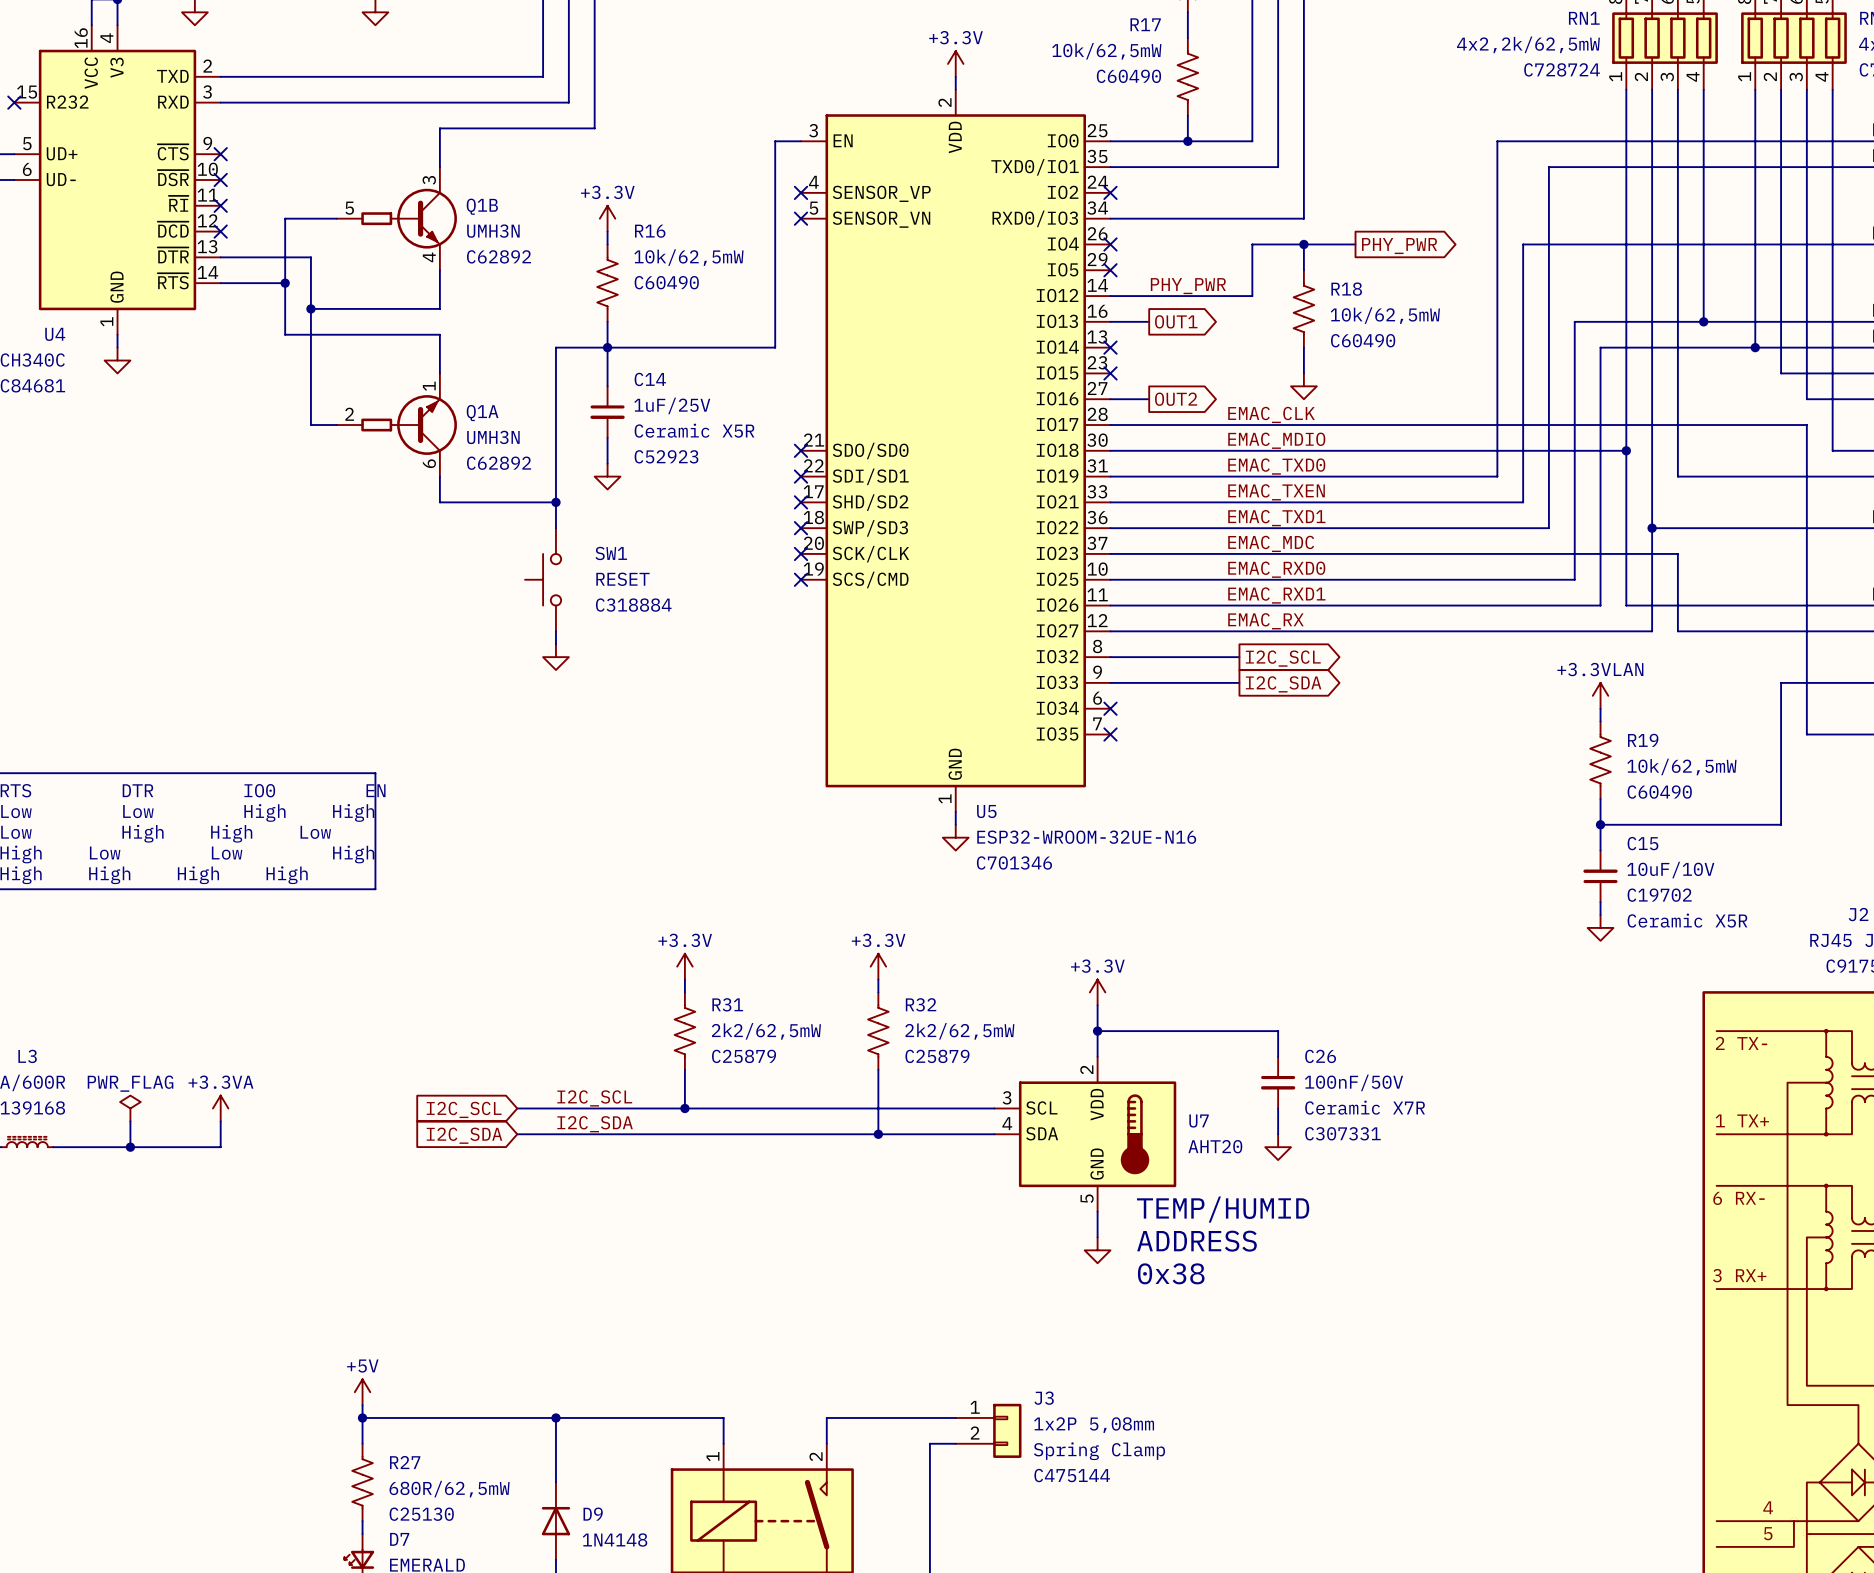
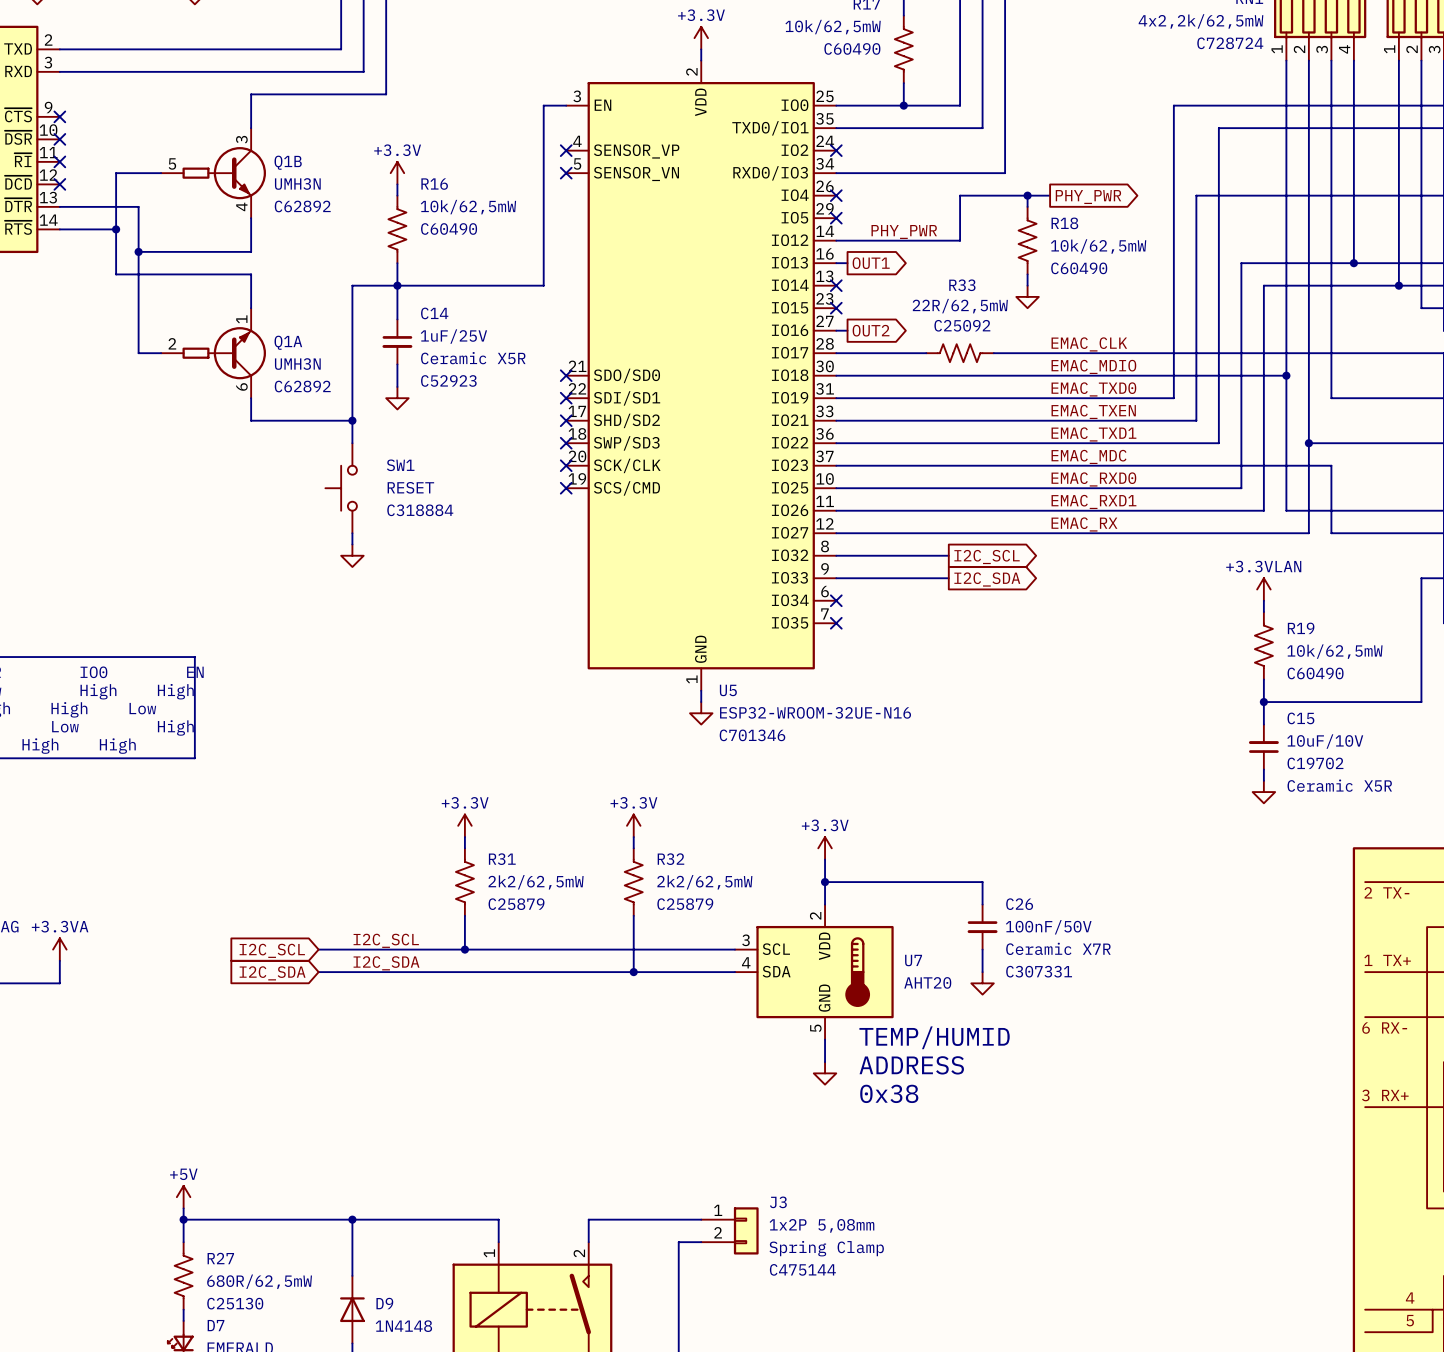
wire: (1303, 244) (1303, 270) -> none
junction position: (1303, 244) -> (1027, 195)
wire: none -> (1027, 195) (1027, 206)
R18 position: (1303, 308) -> (1027, 240)
wire: (1123, 321) (1149, 321) -> none
global label position: OUT1 (1176, 321) -> OUT1 (871, 263)
wire: none -> (1027, 274) (1027, 285)
wire: (1303, 347) (1303, 373) -> none
power symbol position: (1303, 386) -> (1027, 296)
wire: (1123, 399) (1149, 399) -> none
global label position: OUT2 (1176, 399) -> OUT2 (871, 330)
label position: EMAC_CLK (1271, 414) -> EMAC_CLK (1089, 344)
R33: none -> 22R/62,5mW (960, 353)
label position: EMAC_MDIO (1276, 440) -> EMAC_MDIO (1093, 366)
label position: EMAC_TXD0 (1276, 466) -> EMAC_TXD0 (1093, 389)
label position: EMAC_TXEN (1276, 492) -> EMAC_TXEN (1093, 411)
label position: EMAC_TXD1 (1276, 518) -> EMAC_TXD1 (1093, 434)
label position: EMAC_MDC (1271, 543) -> EMAC_MDC (1089, 456)
label position: EMAC_RXD0 (1276, 569) -> EMAC_RXD0 (1093, 479)
label position: EMAC_RXD1 (1276, 595) -> EMAC_RXD1 (1093, 501)
label position: EMAC_RX (1265, 621) -> EMAC_RX (1084, 524)

